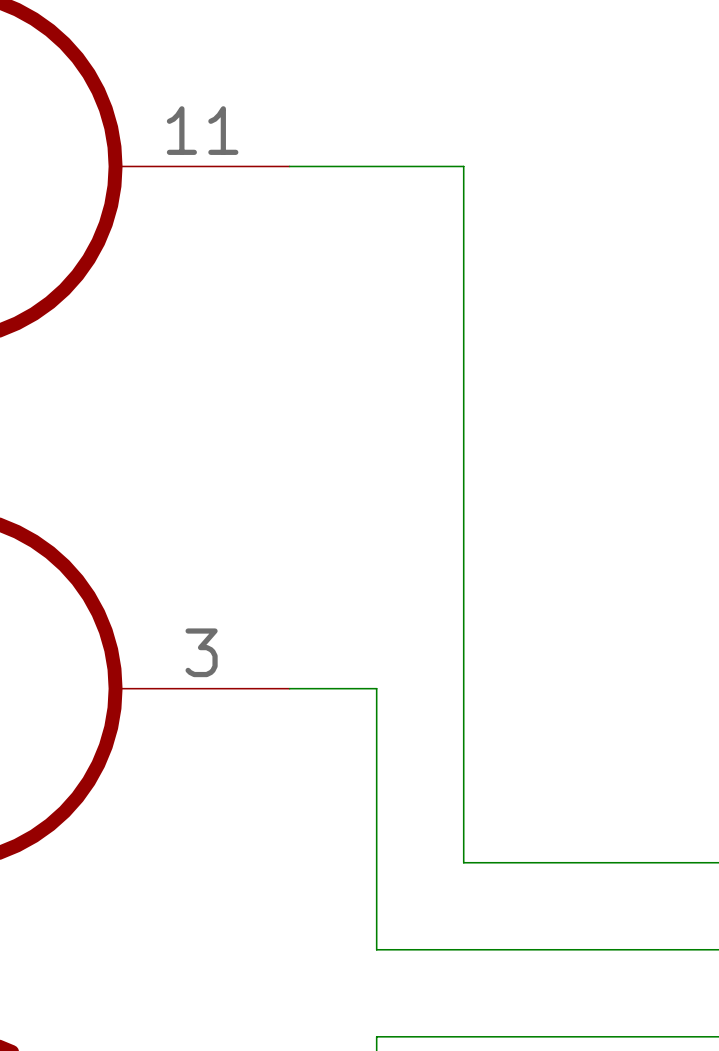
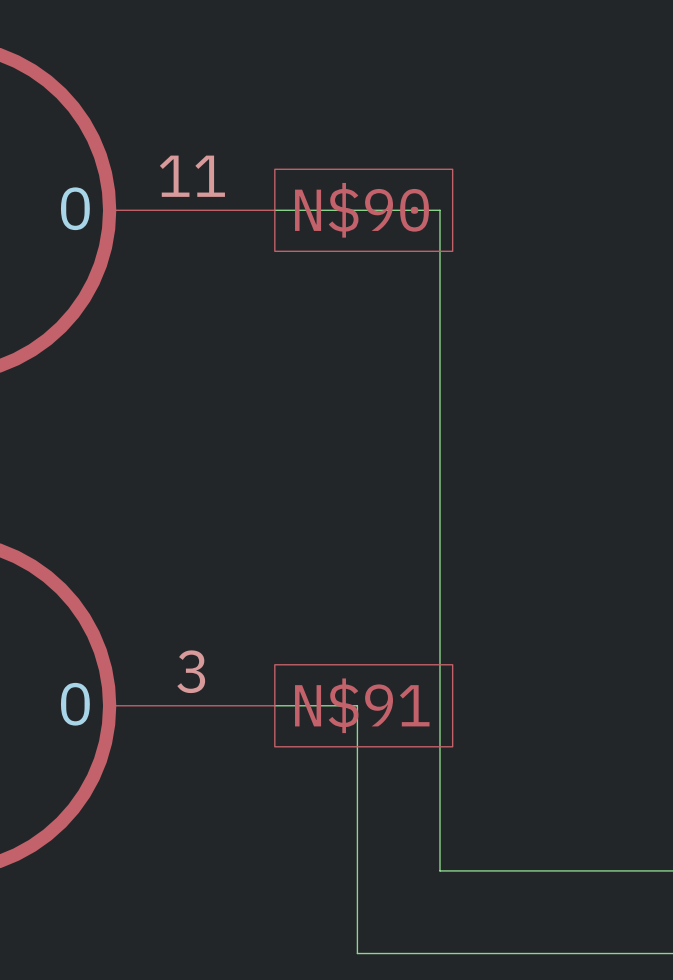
part pin name: none -> O (75, 208)
global label: none -> N$90 (362, 210)
part pin name: none -> O (75, 704)
global label: none -> N$91 (362, 705)

